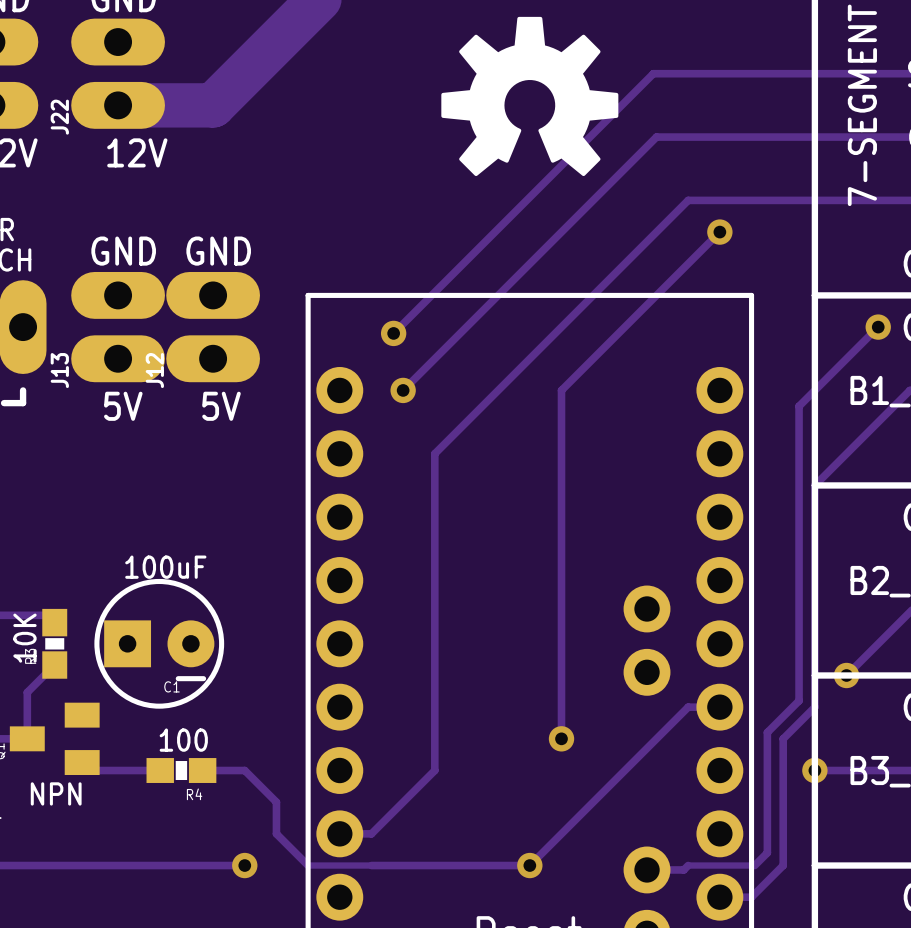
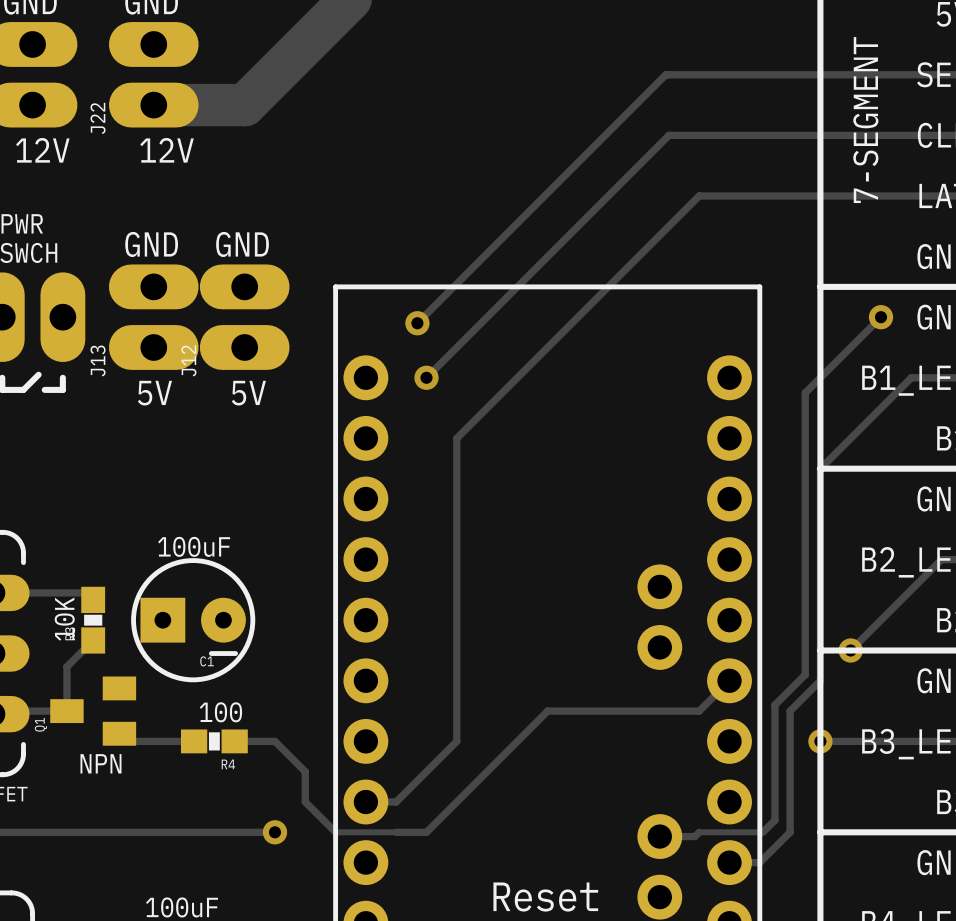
drawing: [441, 16, 619, 177] -> none
track: (719, 232) (561, 390) (561, 738) -> none
via: (719, 232) -> none
track: (719, 707) (688, 707) (529, 865) (403, 865) -> (729, 680) (699, 711) (547, 711) (426, 832)
via: (561, 738) -> none
via: (529, 865) -> none

